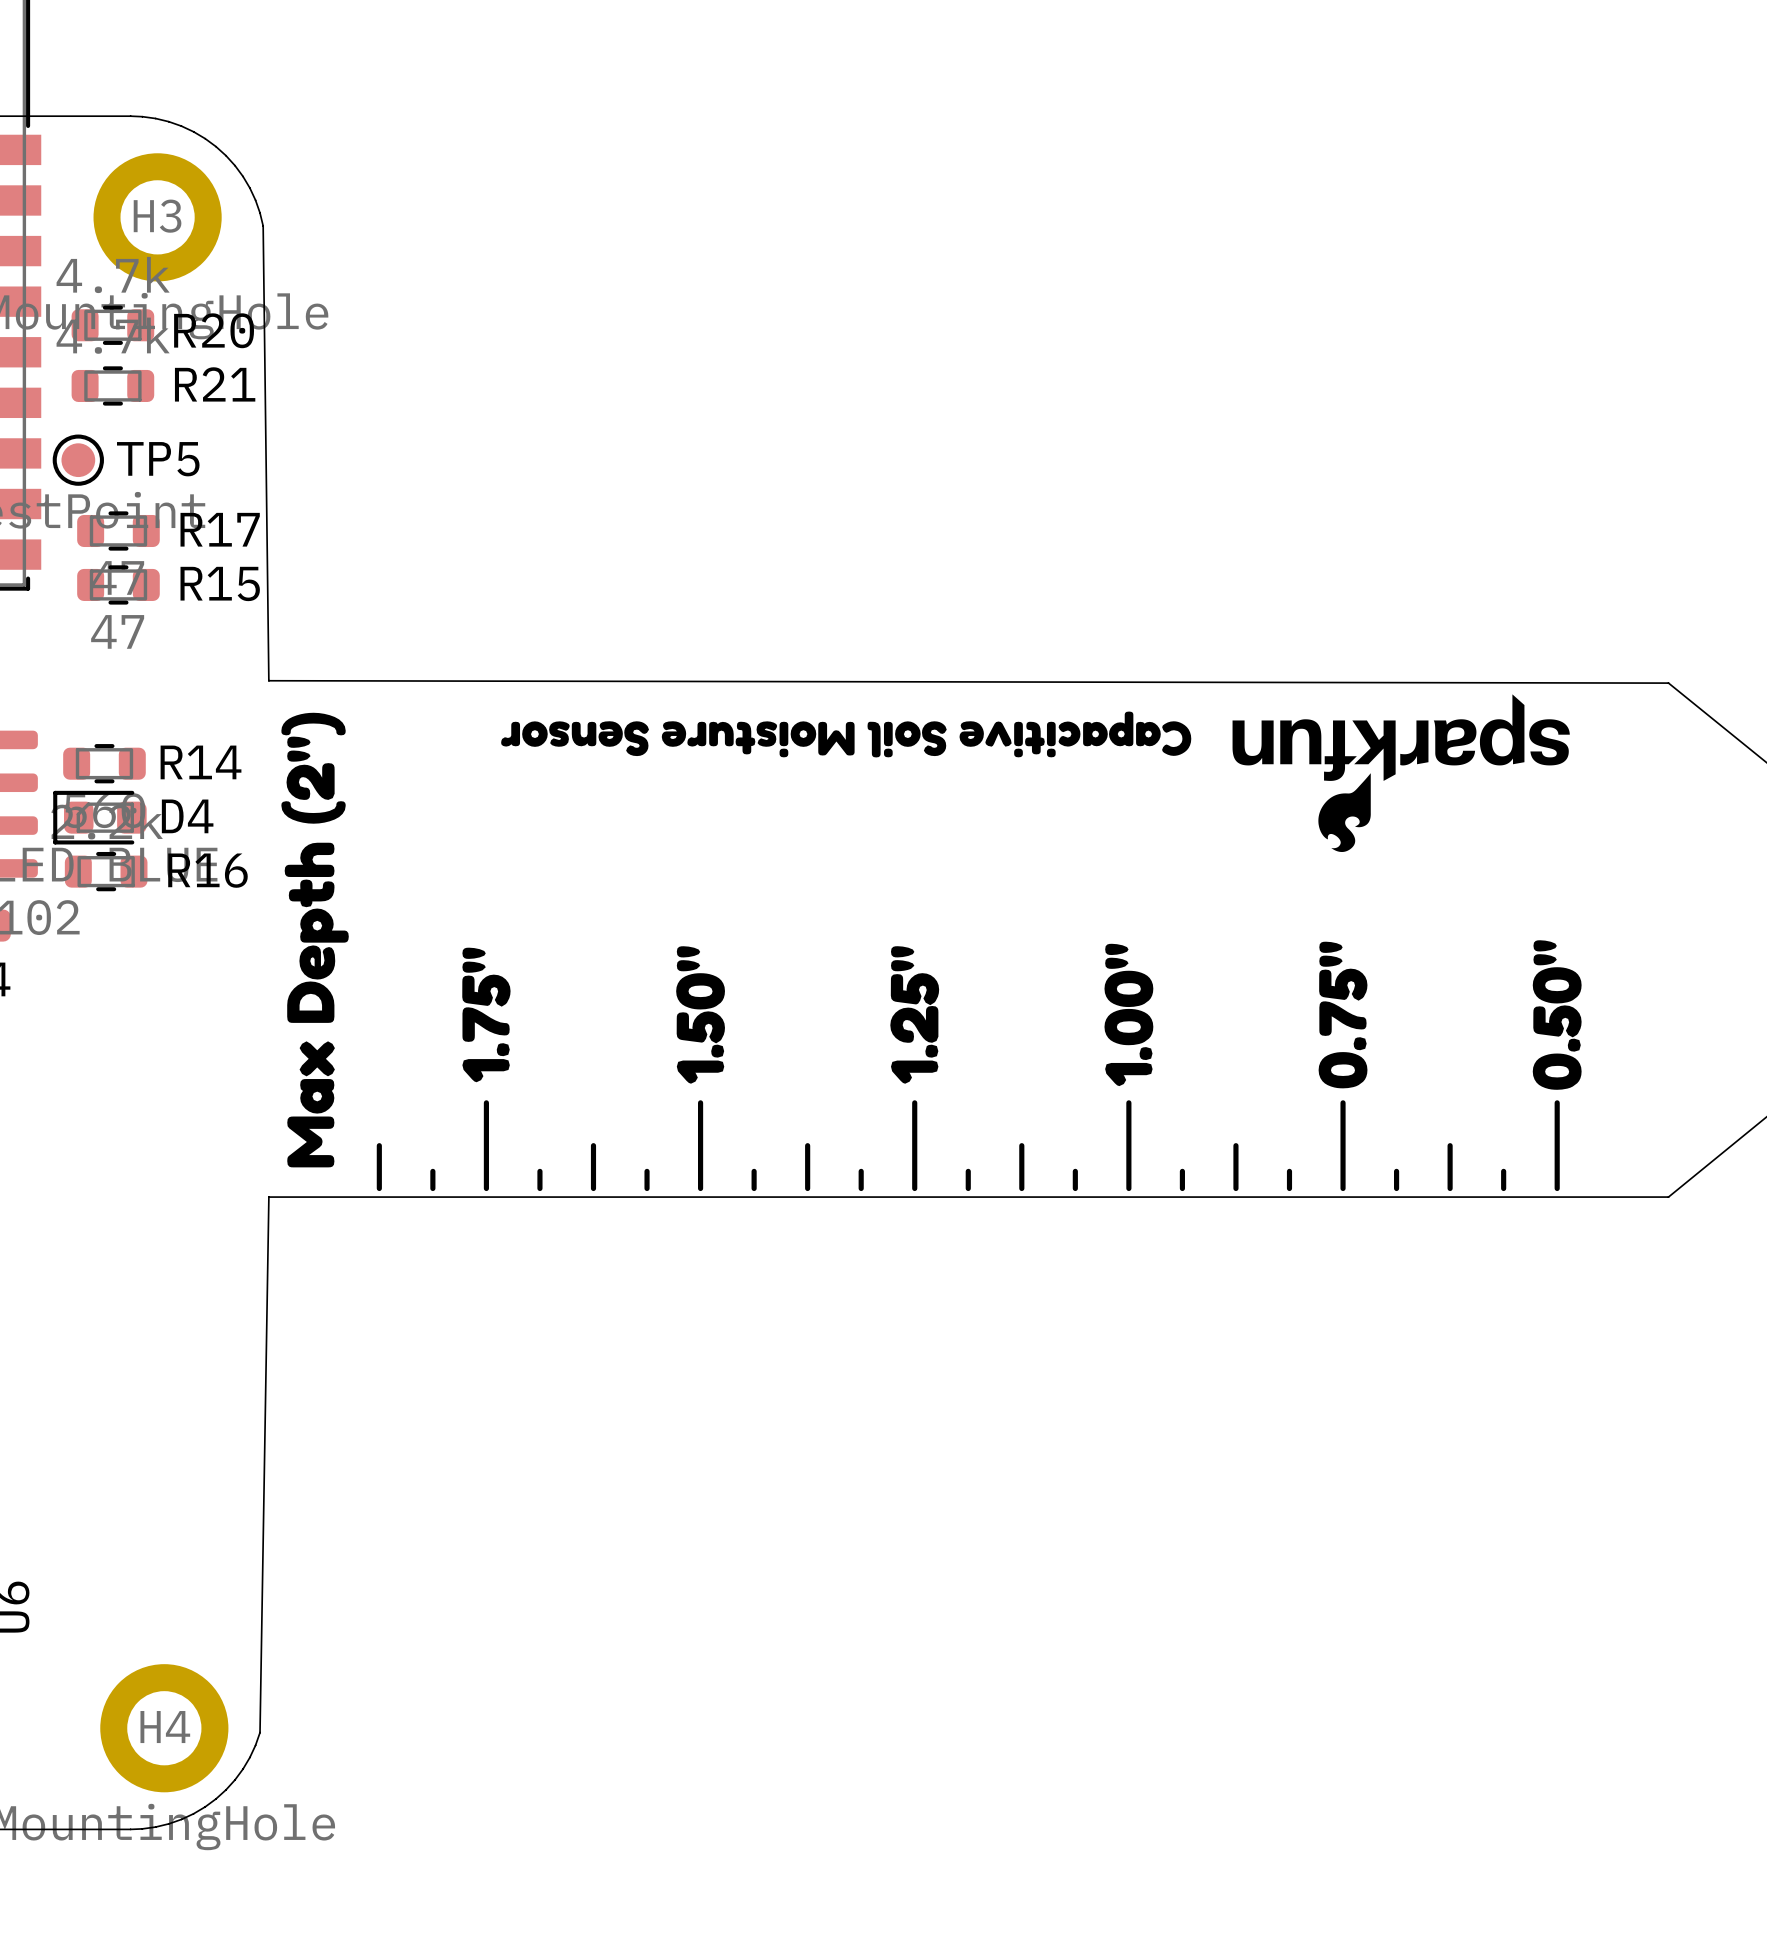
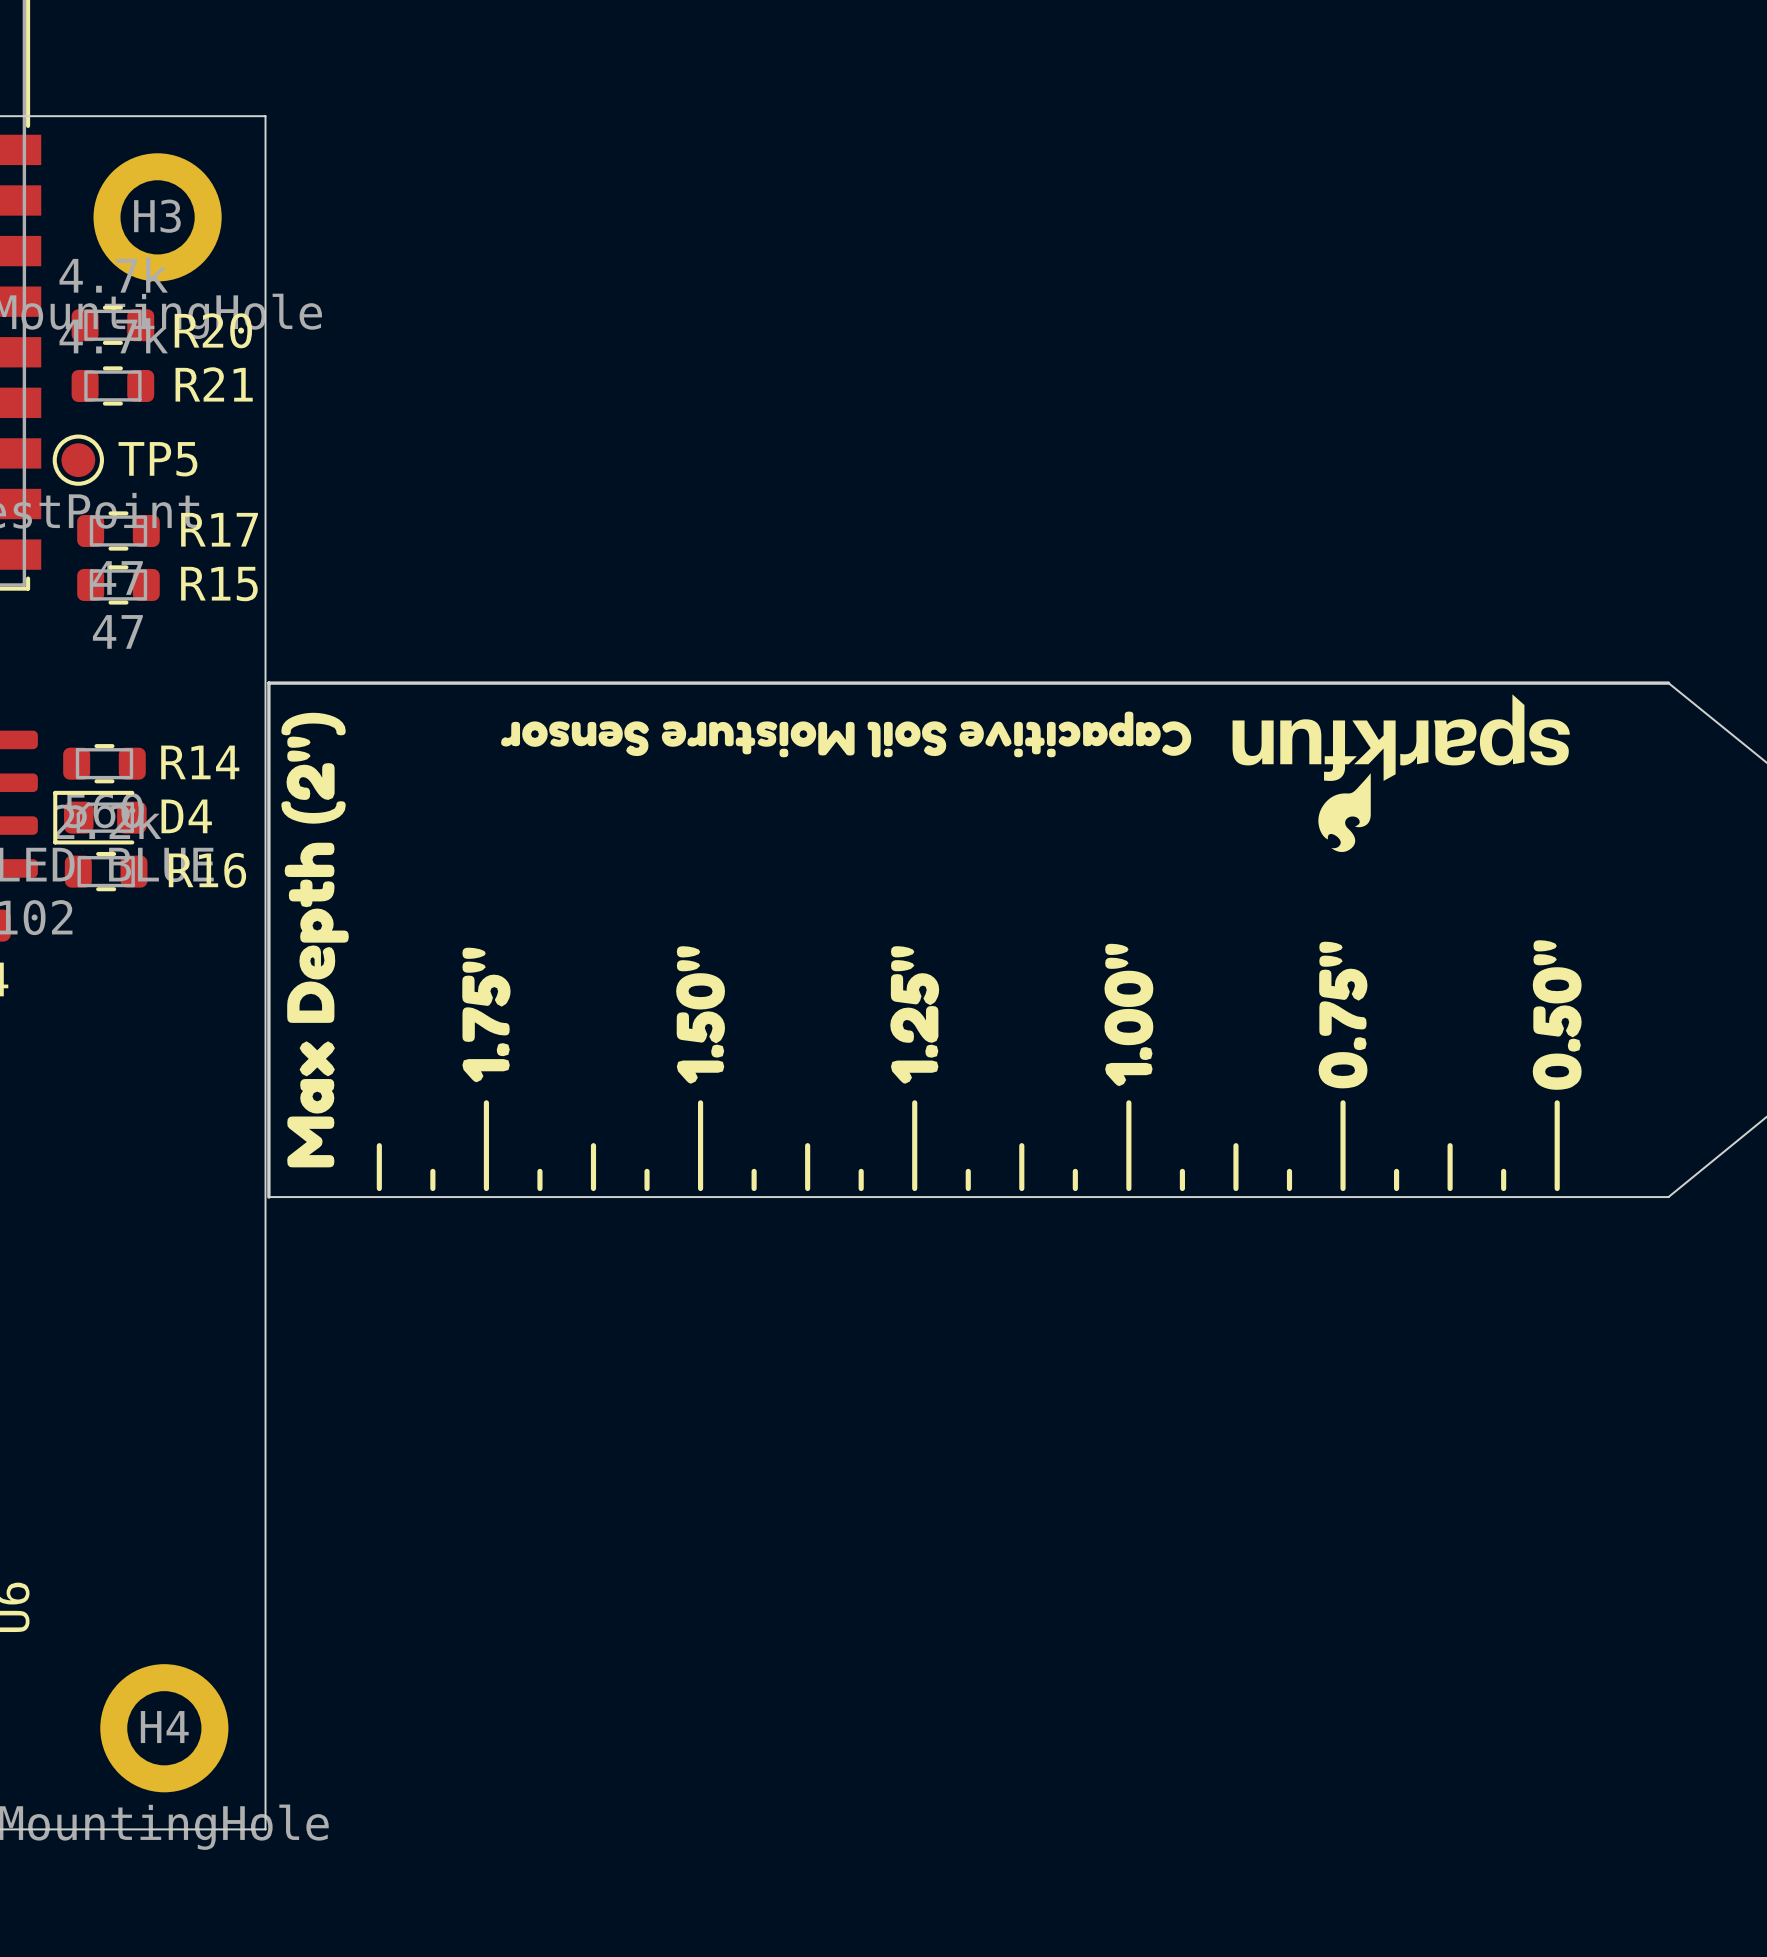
board edge: (130, 116) (155, 118) (181, 126) (216, 146) (243, 176) (260, 212) (263, 225) (268, 680) (1668, 683) -> (268, 1197) (268, 683) (1668, 683)
board edge: (268, 1197) (260, 1732) (243, 1769) (216, 1798) (181, 1819) (155, 1827) (130, 1829) -> (130, 116) (265, 116) (265, 1829) (130, 1829)

